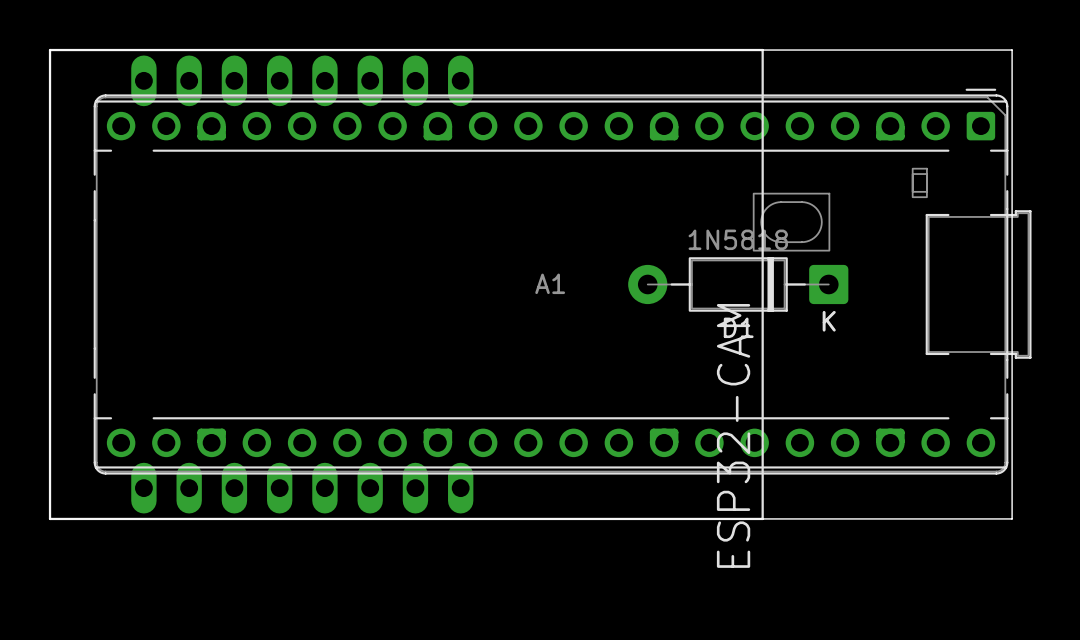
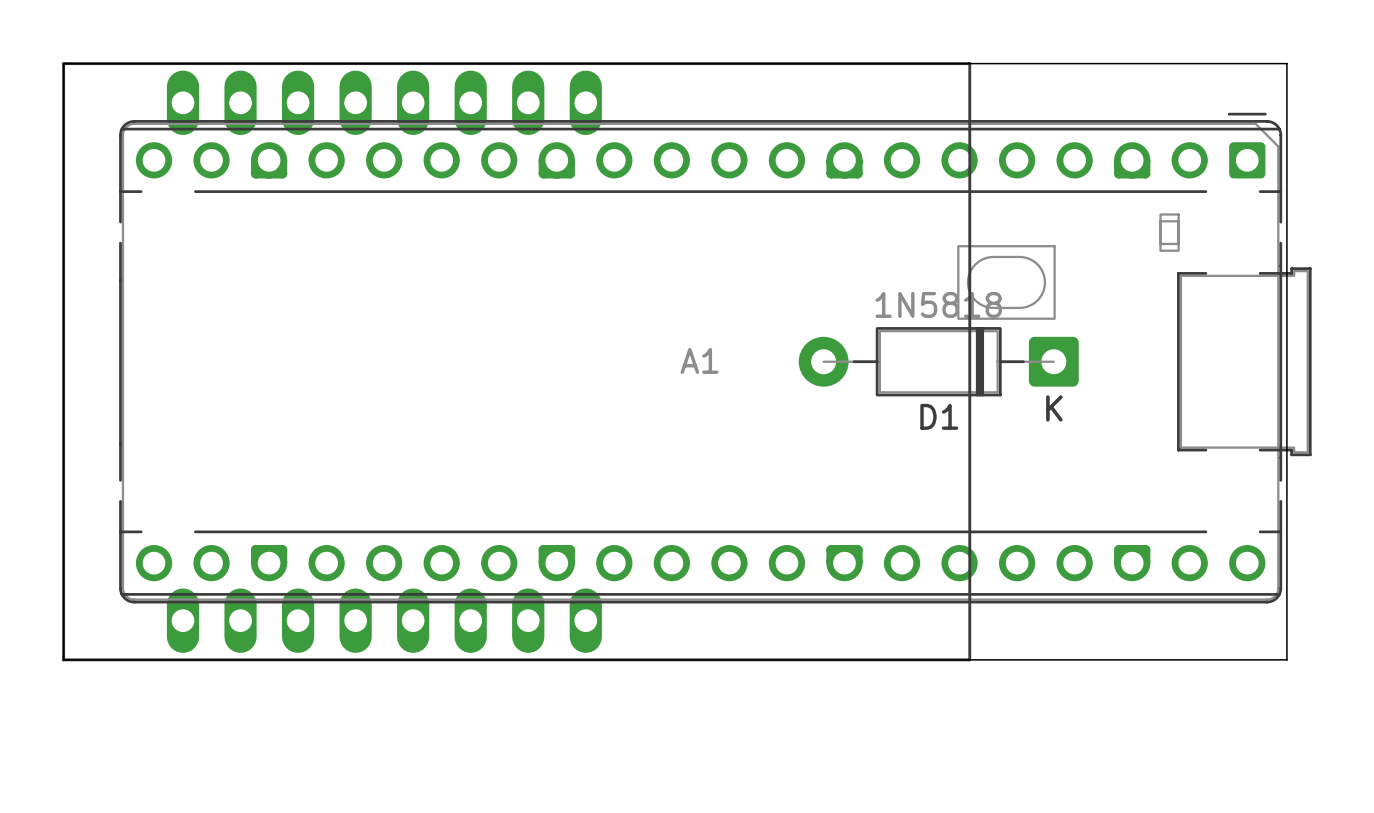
part text: ESP32-CAM (733, 435) -> none

